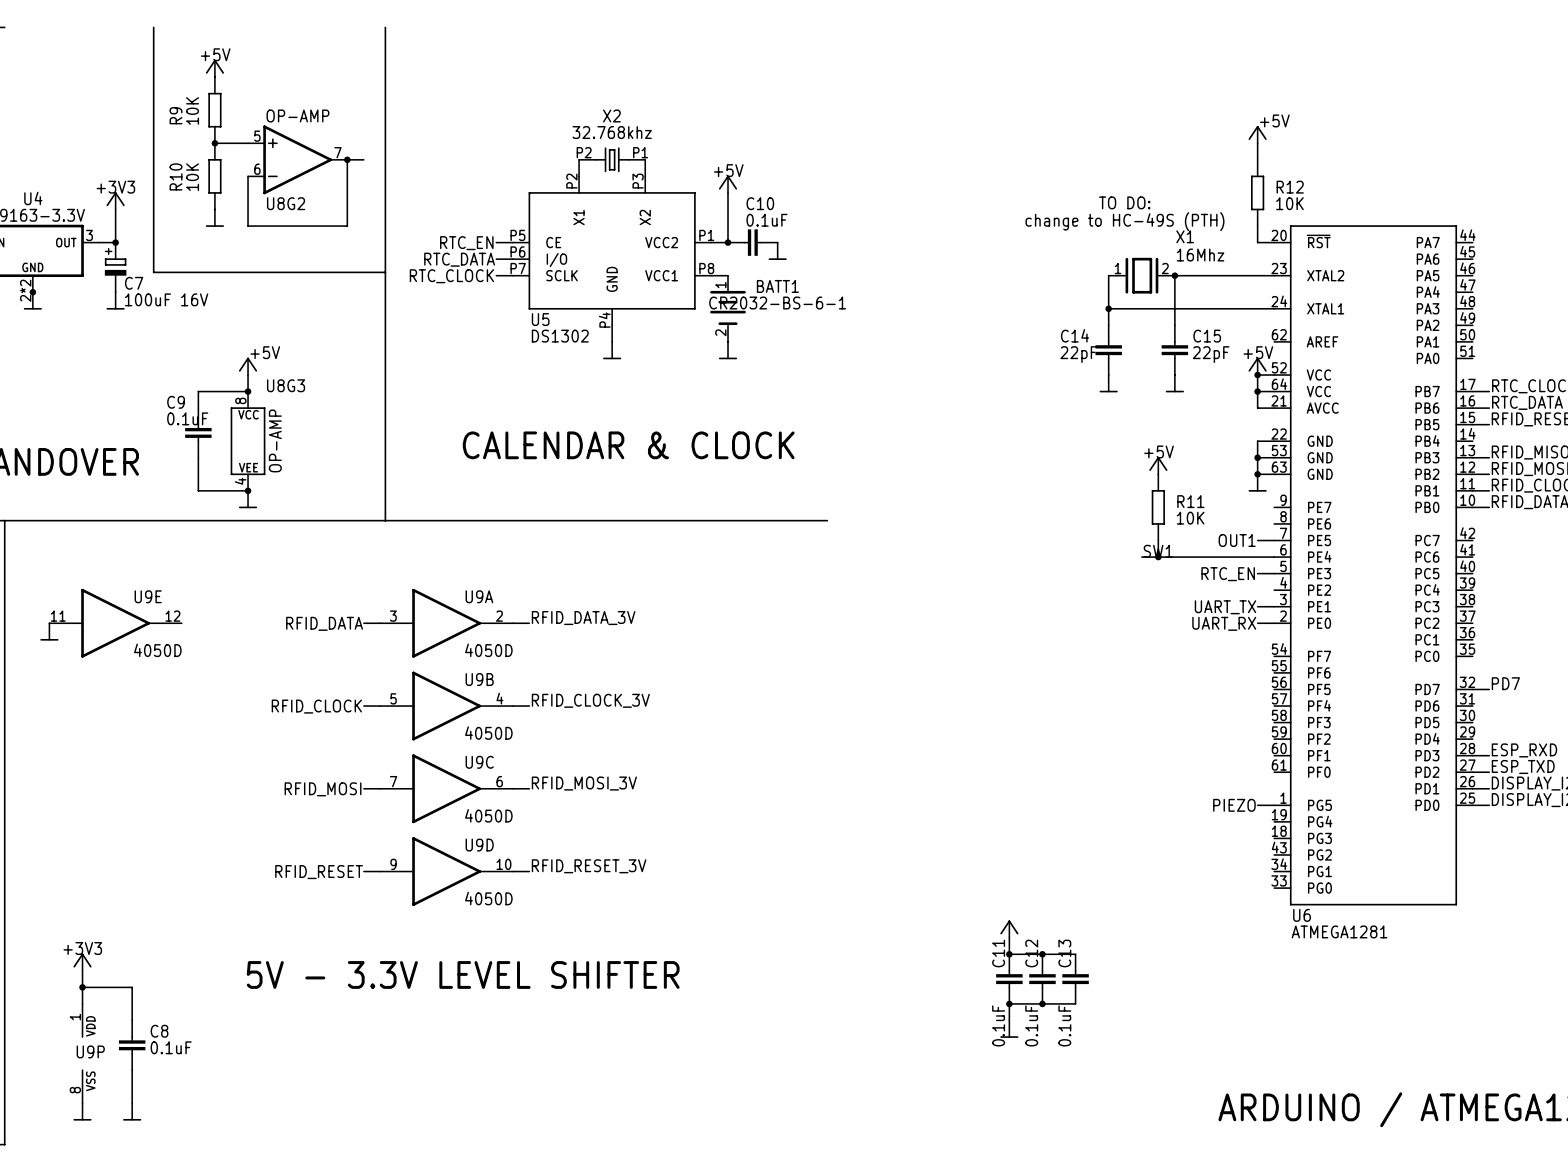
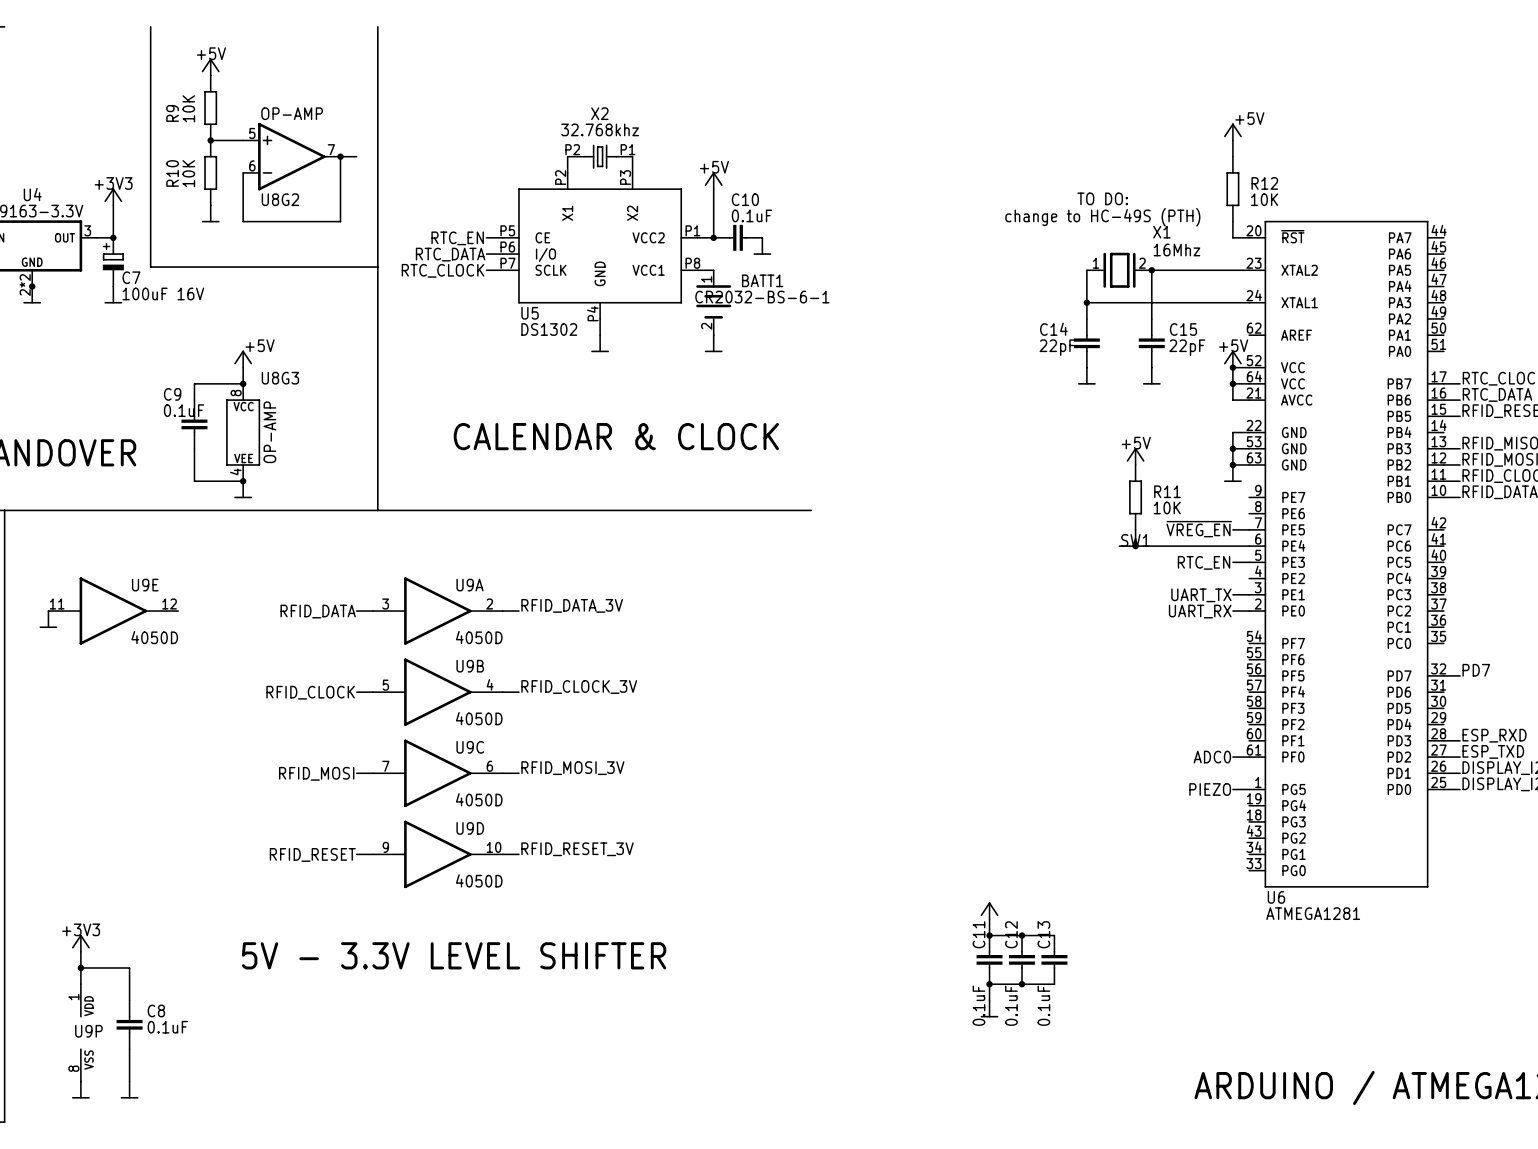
label: OUT1 (1237, 540) -> ~{VREG_EN} (1199, 529)
label: none -> ADC0 (1212, 757)
wire: none -> (1232, 757) (1249, 757)

